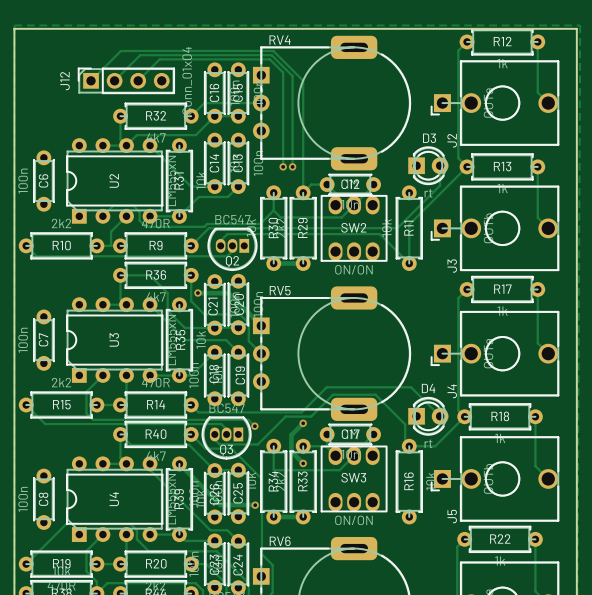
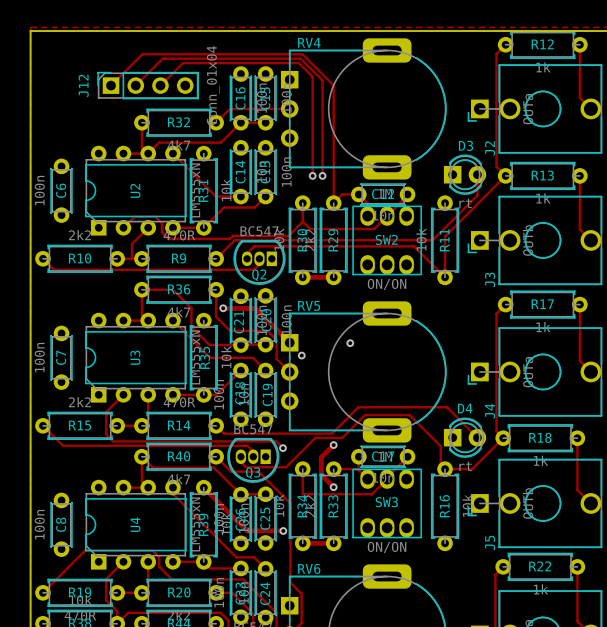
via: none -> (350, 343)
via: none -> (301, 355)

